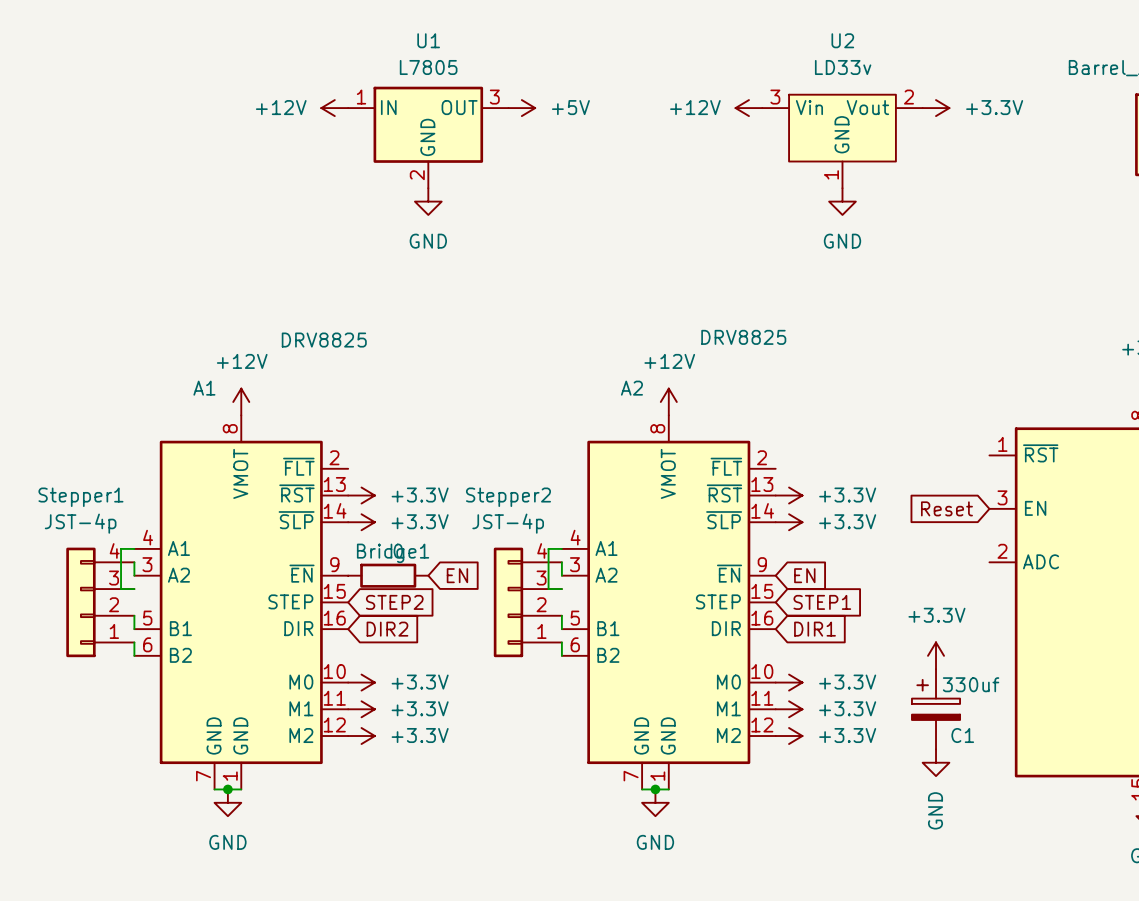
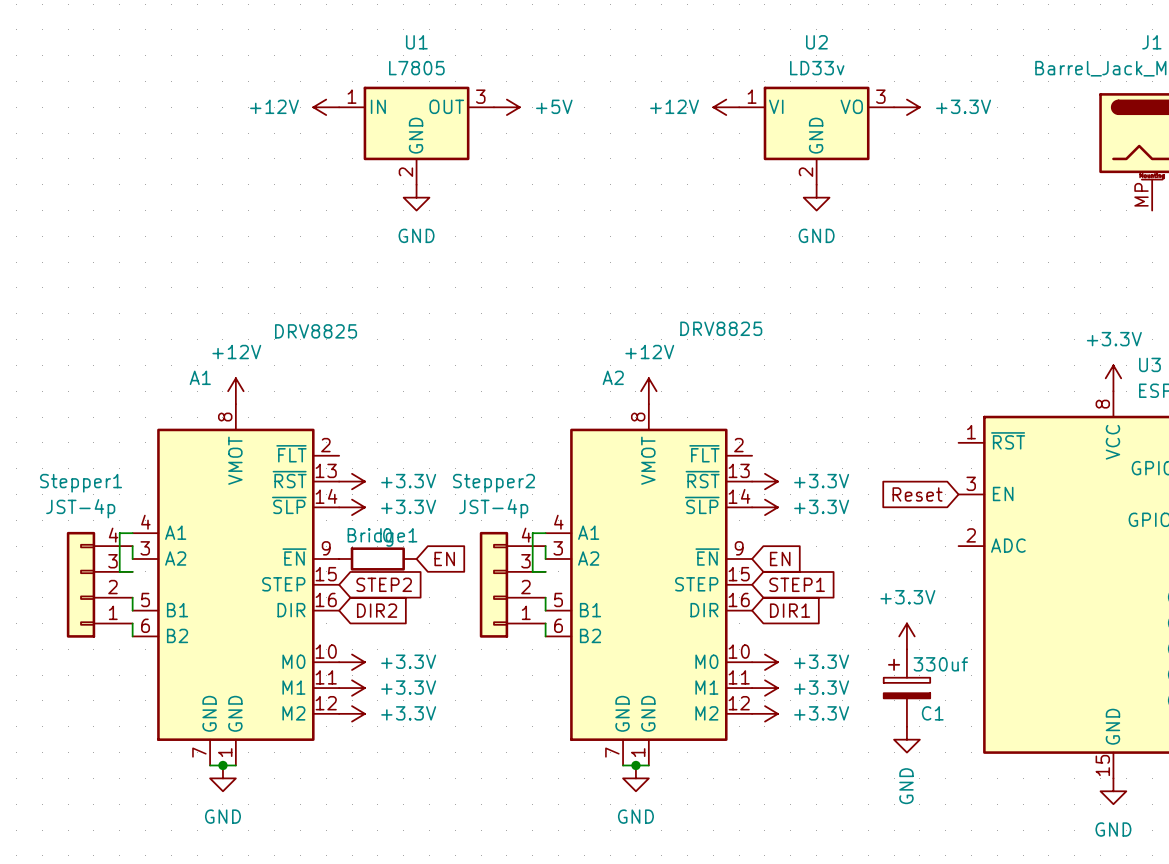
U2 symbol: [762, 94, 923, 189] -> [739, 86, 895, 185]

